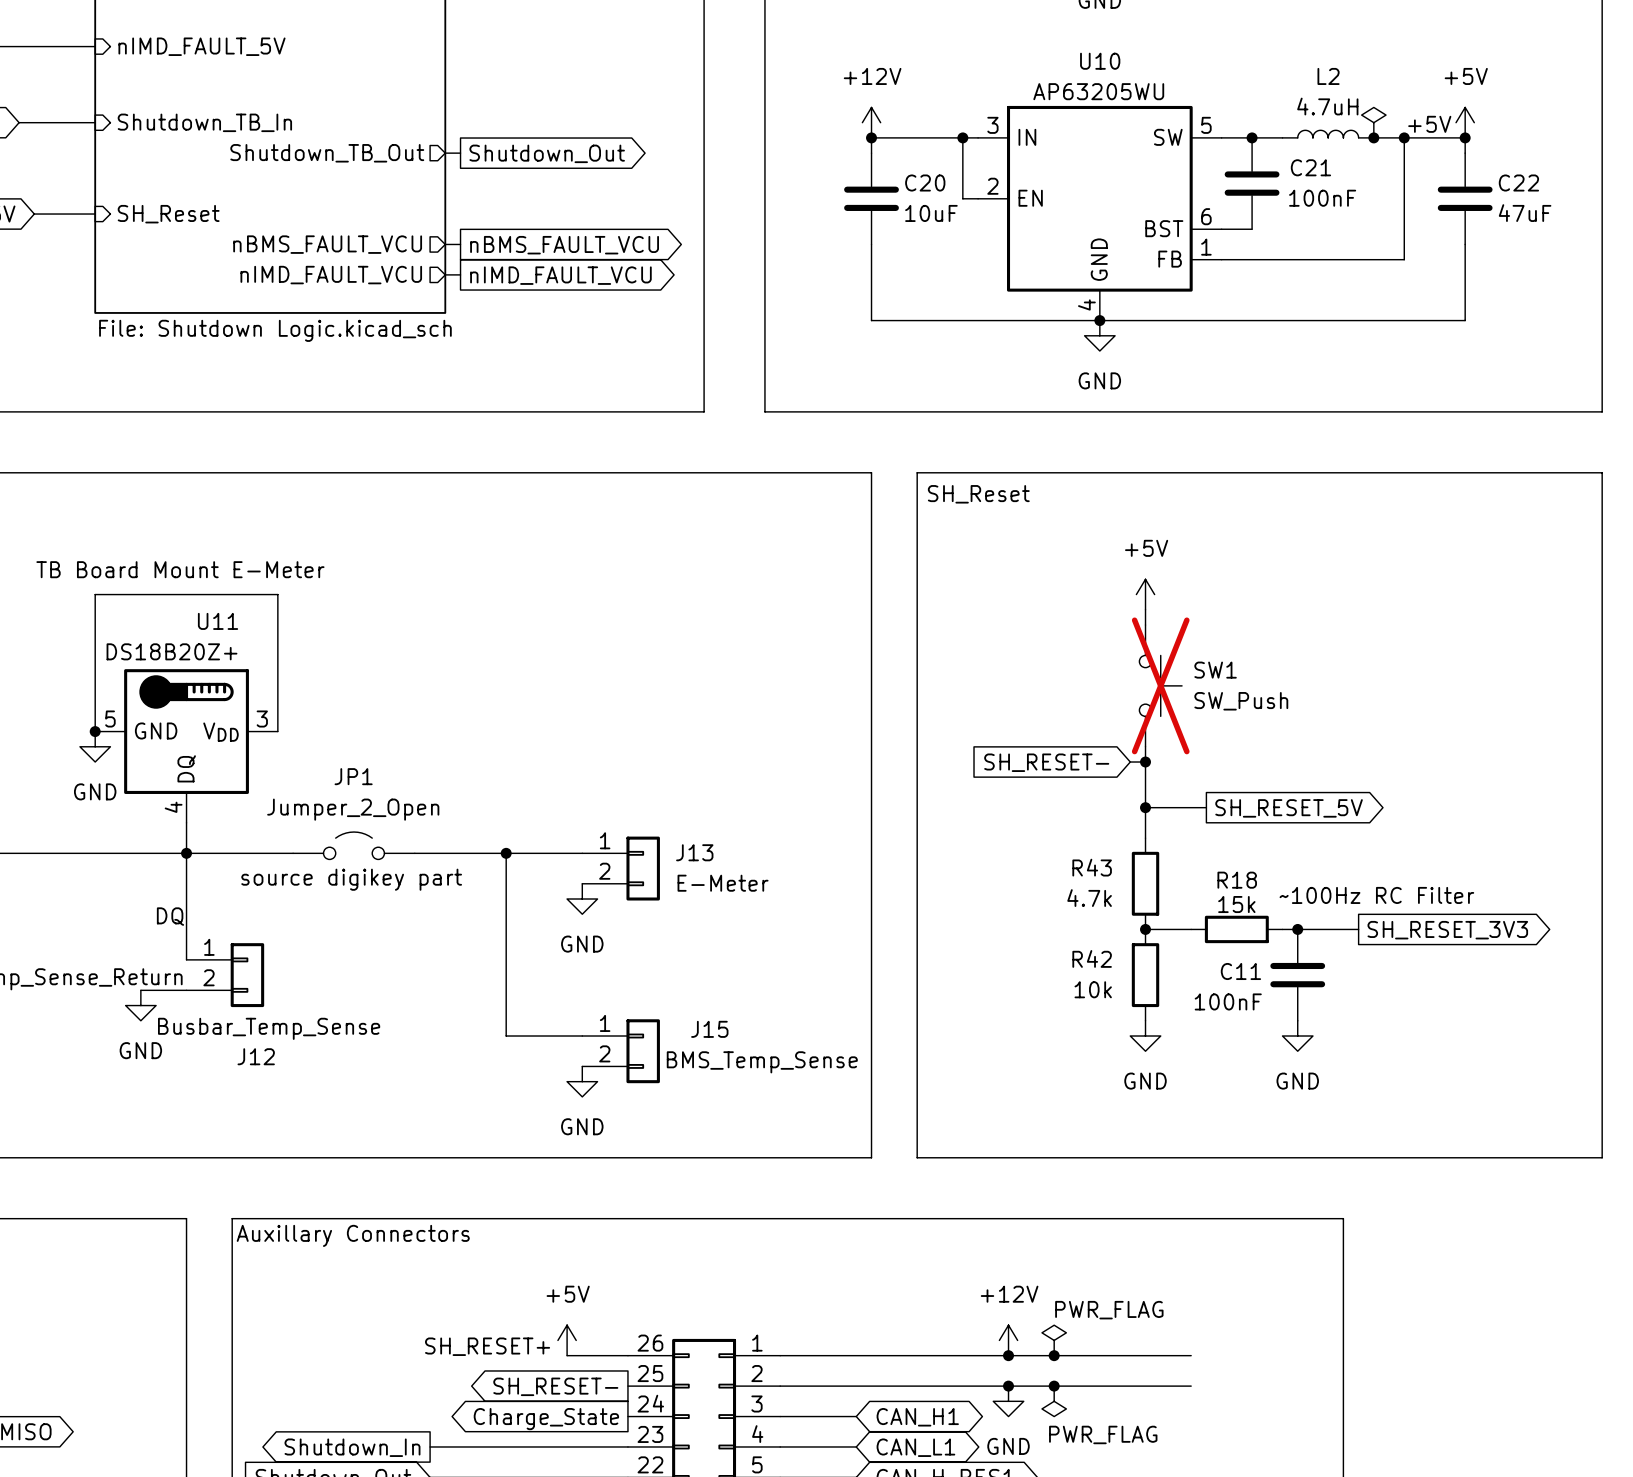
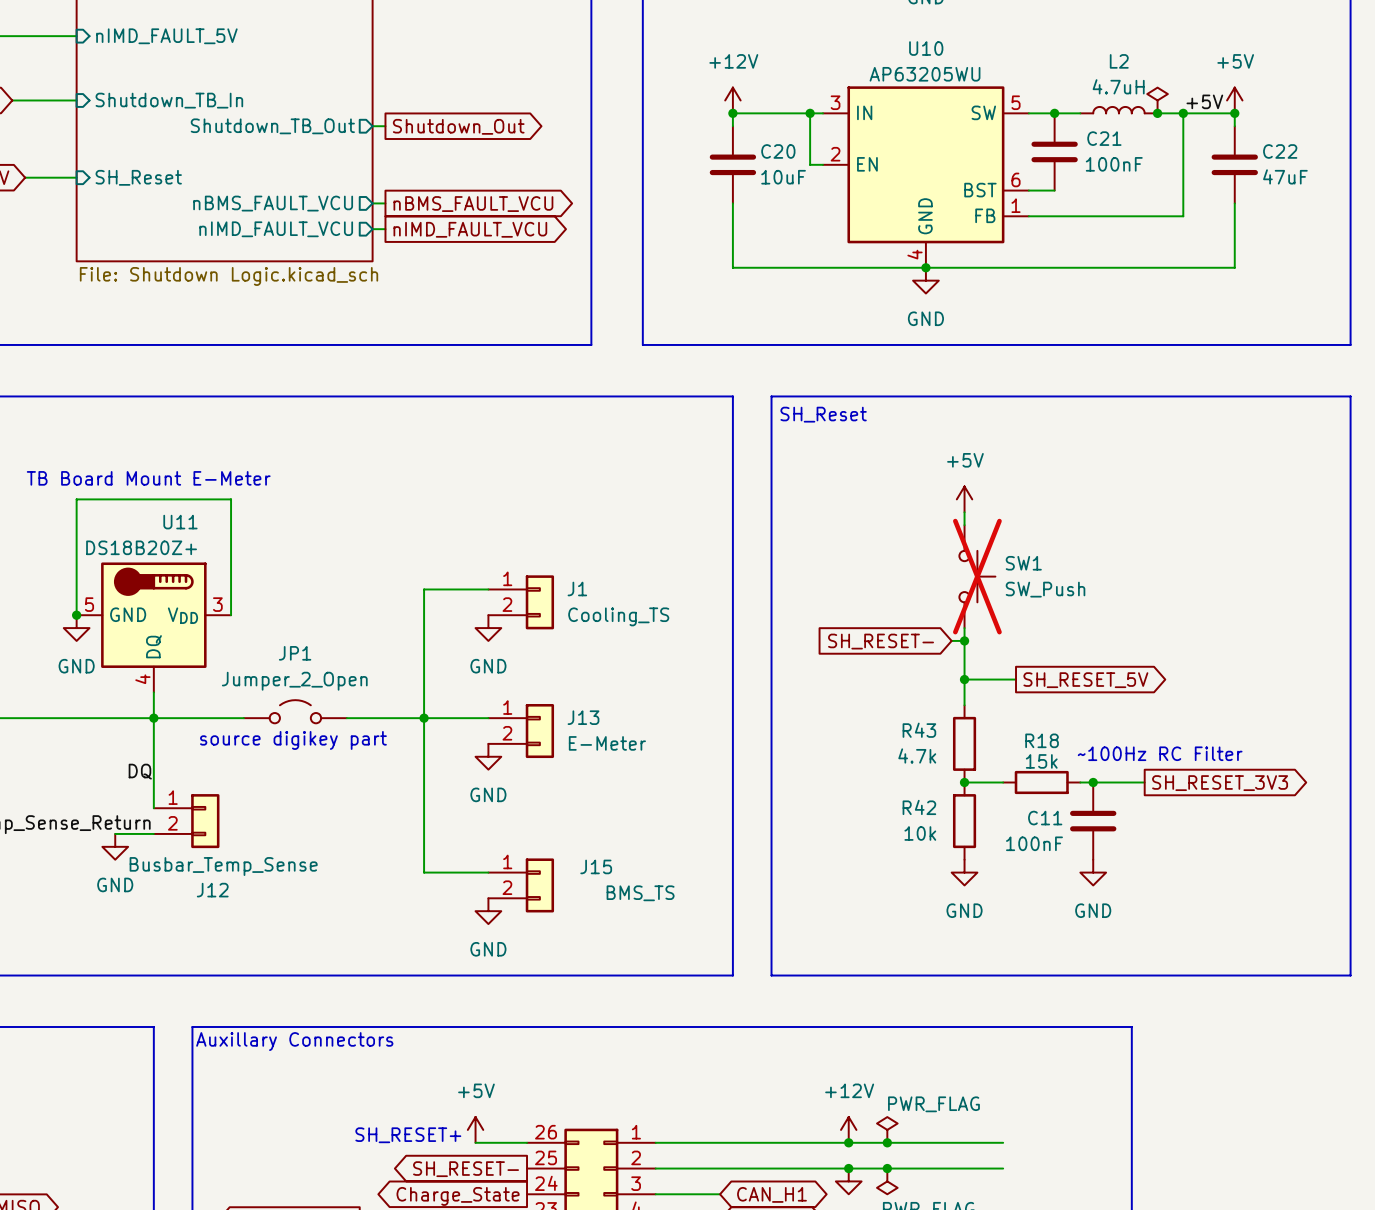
wire: none -> (488, 589) (424, 589) (424, 718)
J1: none -> Cooling_TS (521, 602)
power symbol: none -> GND (488, 628)
J15 value: BMS_Temp_Sense (762, 1062) -> BMS_TS (640, 893)

